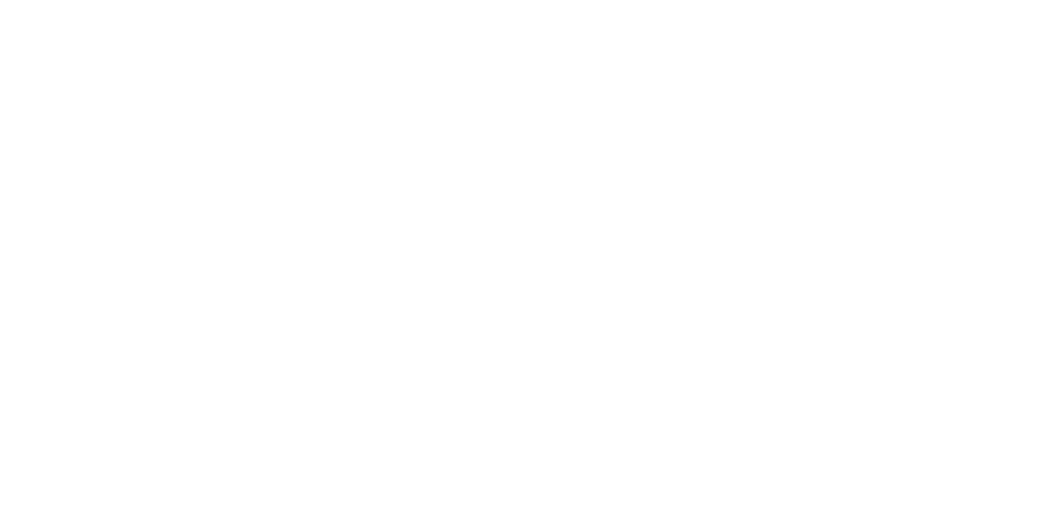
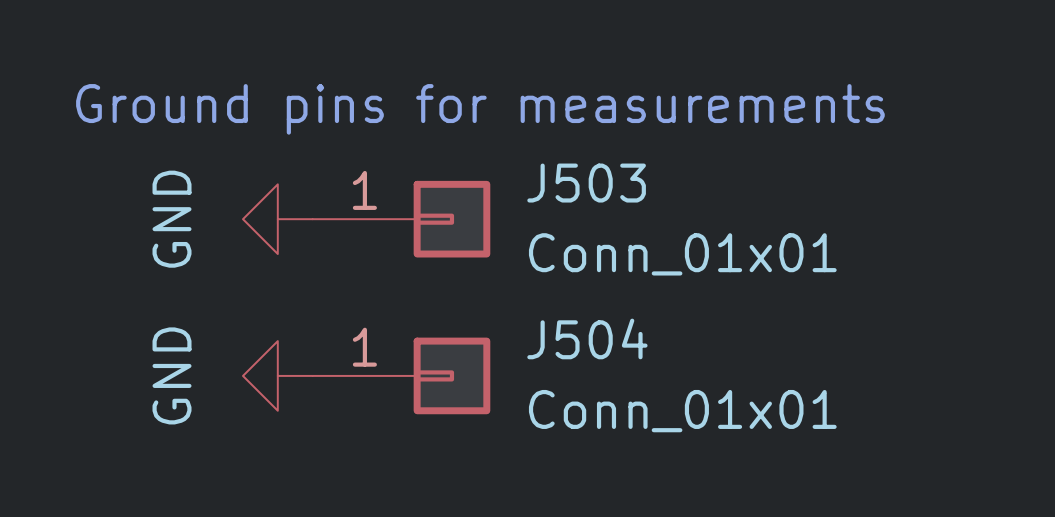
text: none -> Ground pins for measurements (480, 109)
power symbol: none -> GND (277, 219)
J503: none -> Conn_01x01 (401, 219)
power symbol: none -> GND (277, 375)
J504: none -> Conn_01x01 (401, 375)

